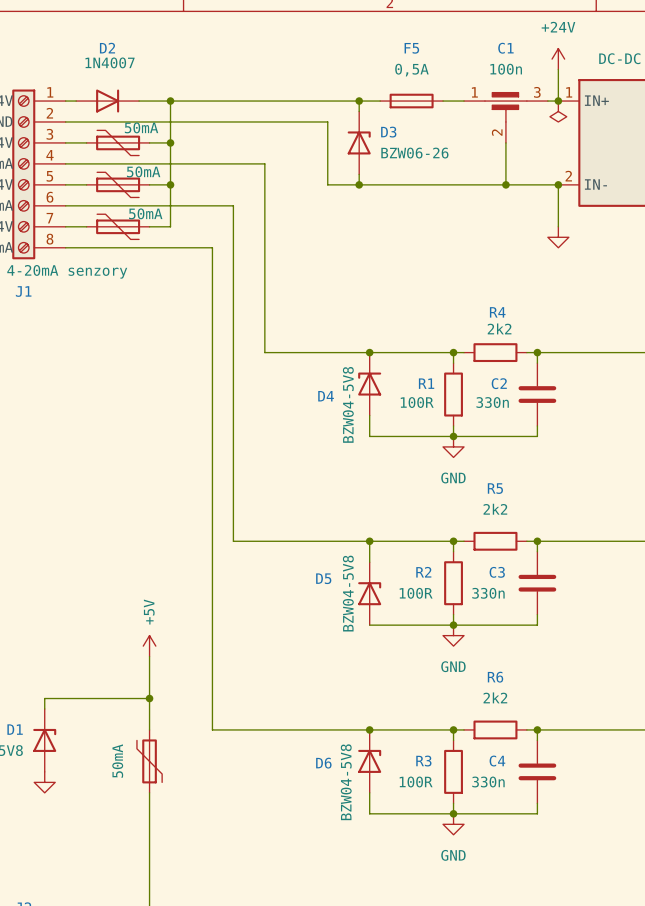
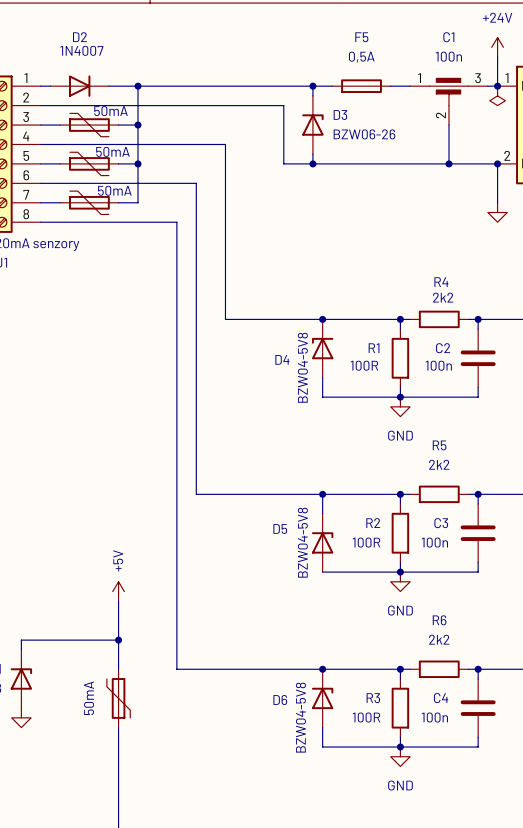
C2 value: 330n (492, 402) -> 100n (438, 365)
C3 value: 330n (488, 593) -> 100n (434, 542)
C4 value: 330n (488, 781) -> 100n (434, 717)

